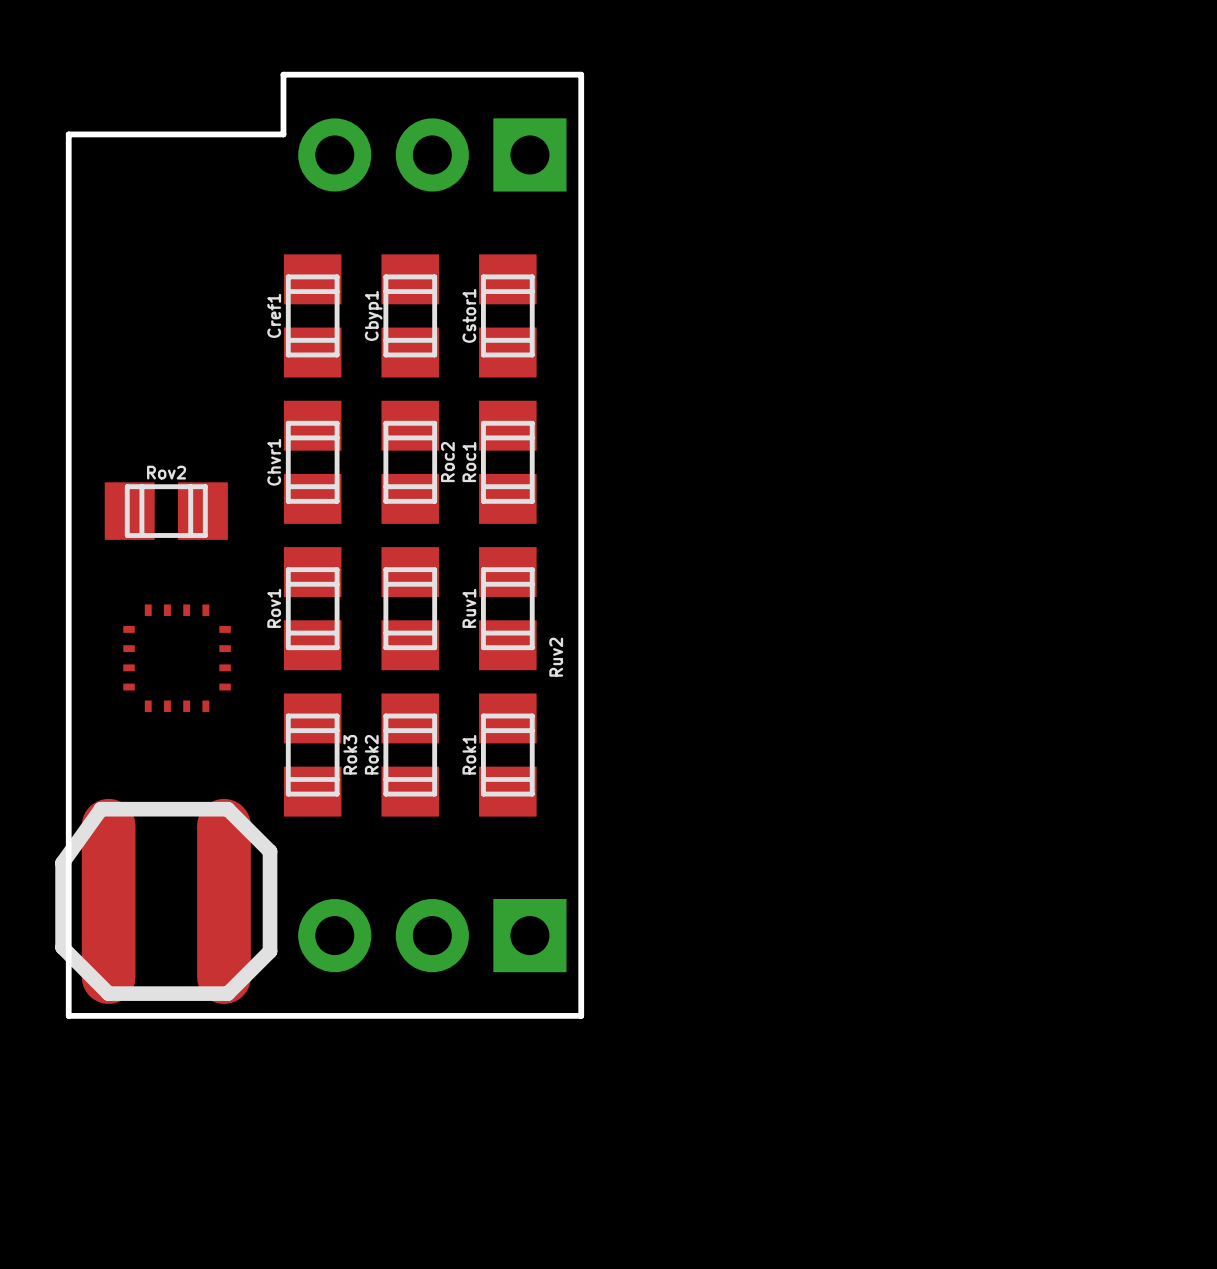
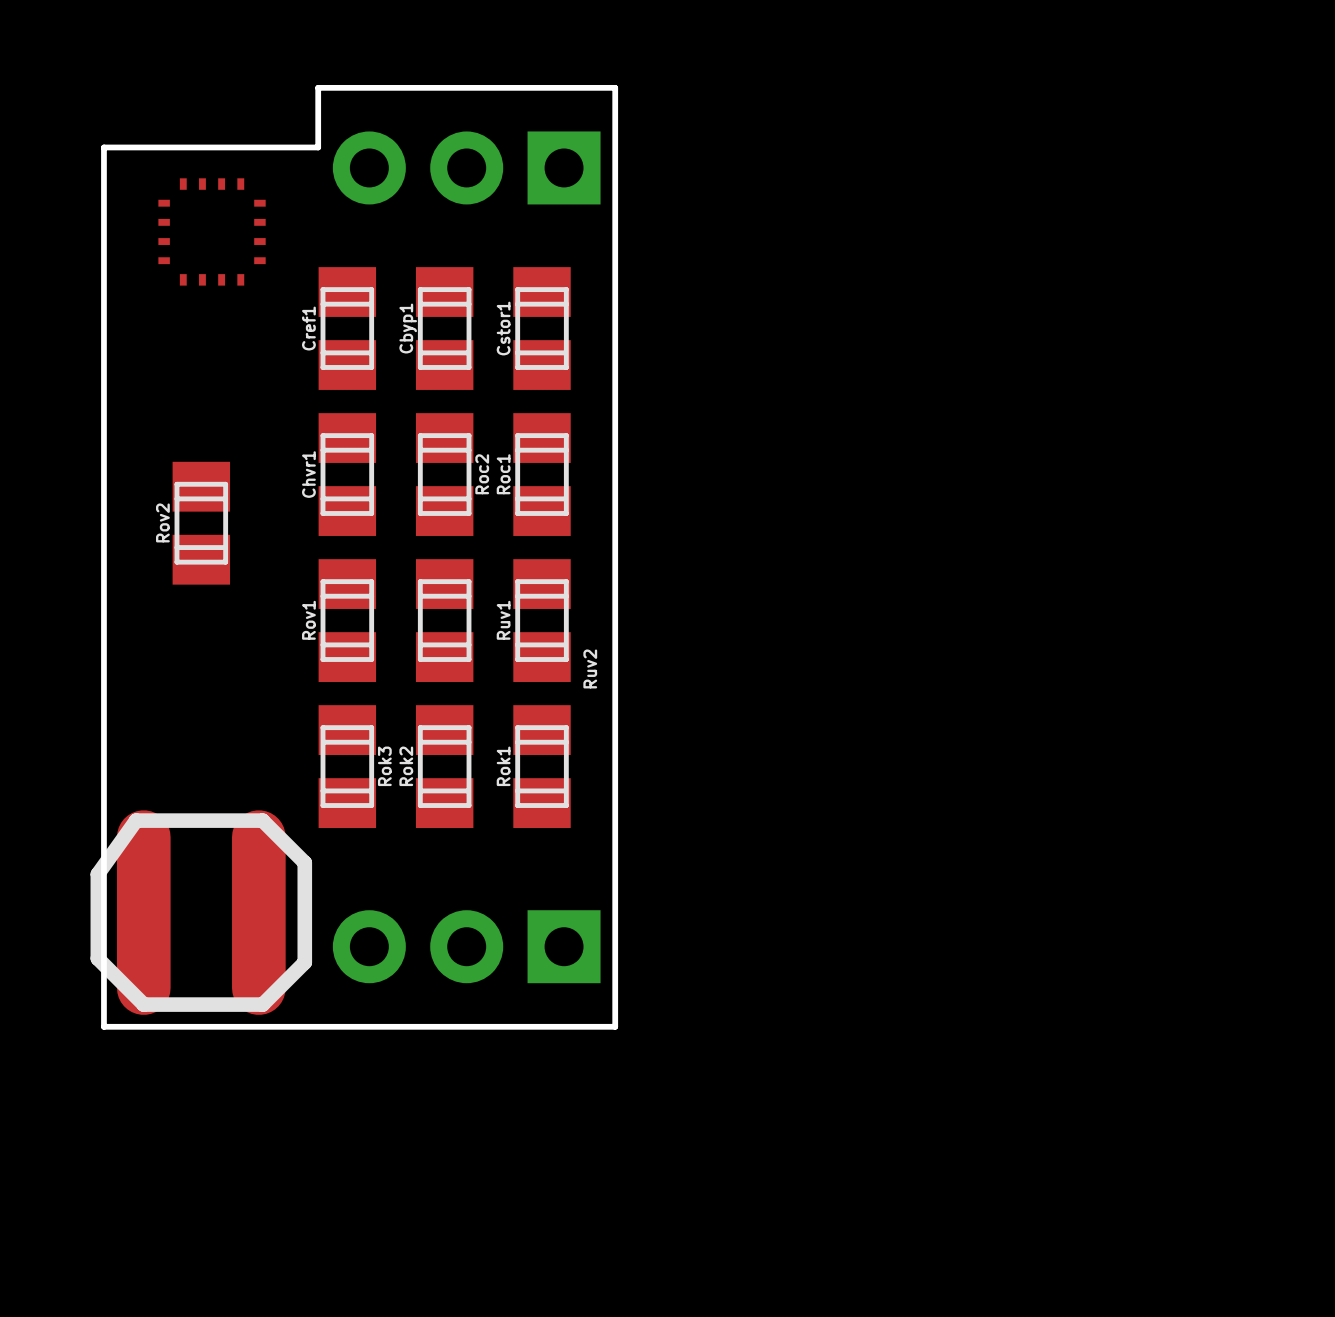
Rov2 rotation: 0° (166, 511) -> 90° counterclockwise (201, 523)
part position: (177, 658) -> (212, 231)

